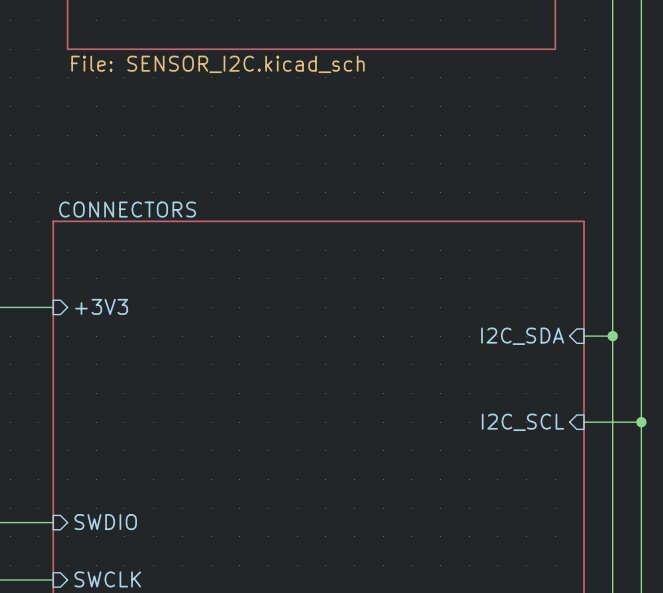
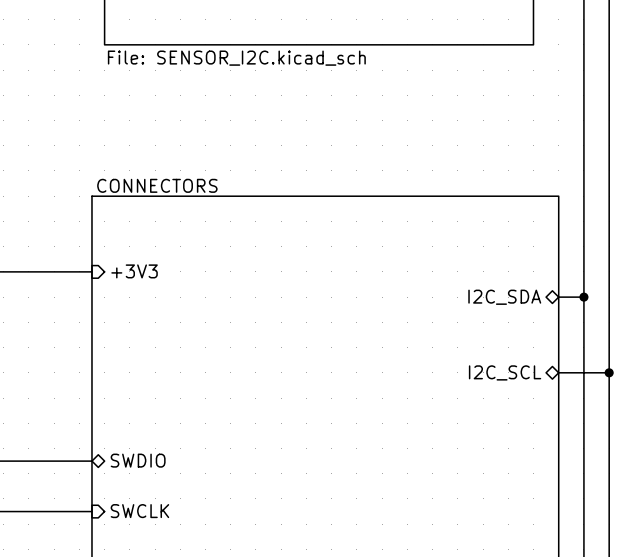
sheet pin shape: input (522, 336) -> bidirectional (504, 297)
sheet pin shape: input (522, 422) -> bidirectional (505, 372)
sheet pin shape: input (105, 522) -> bidirectional (138, 460)

